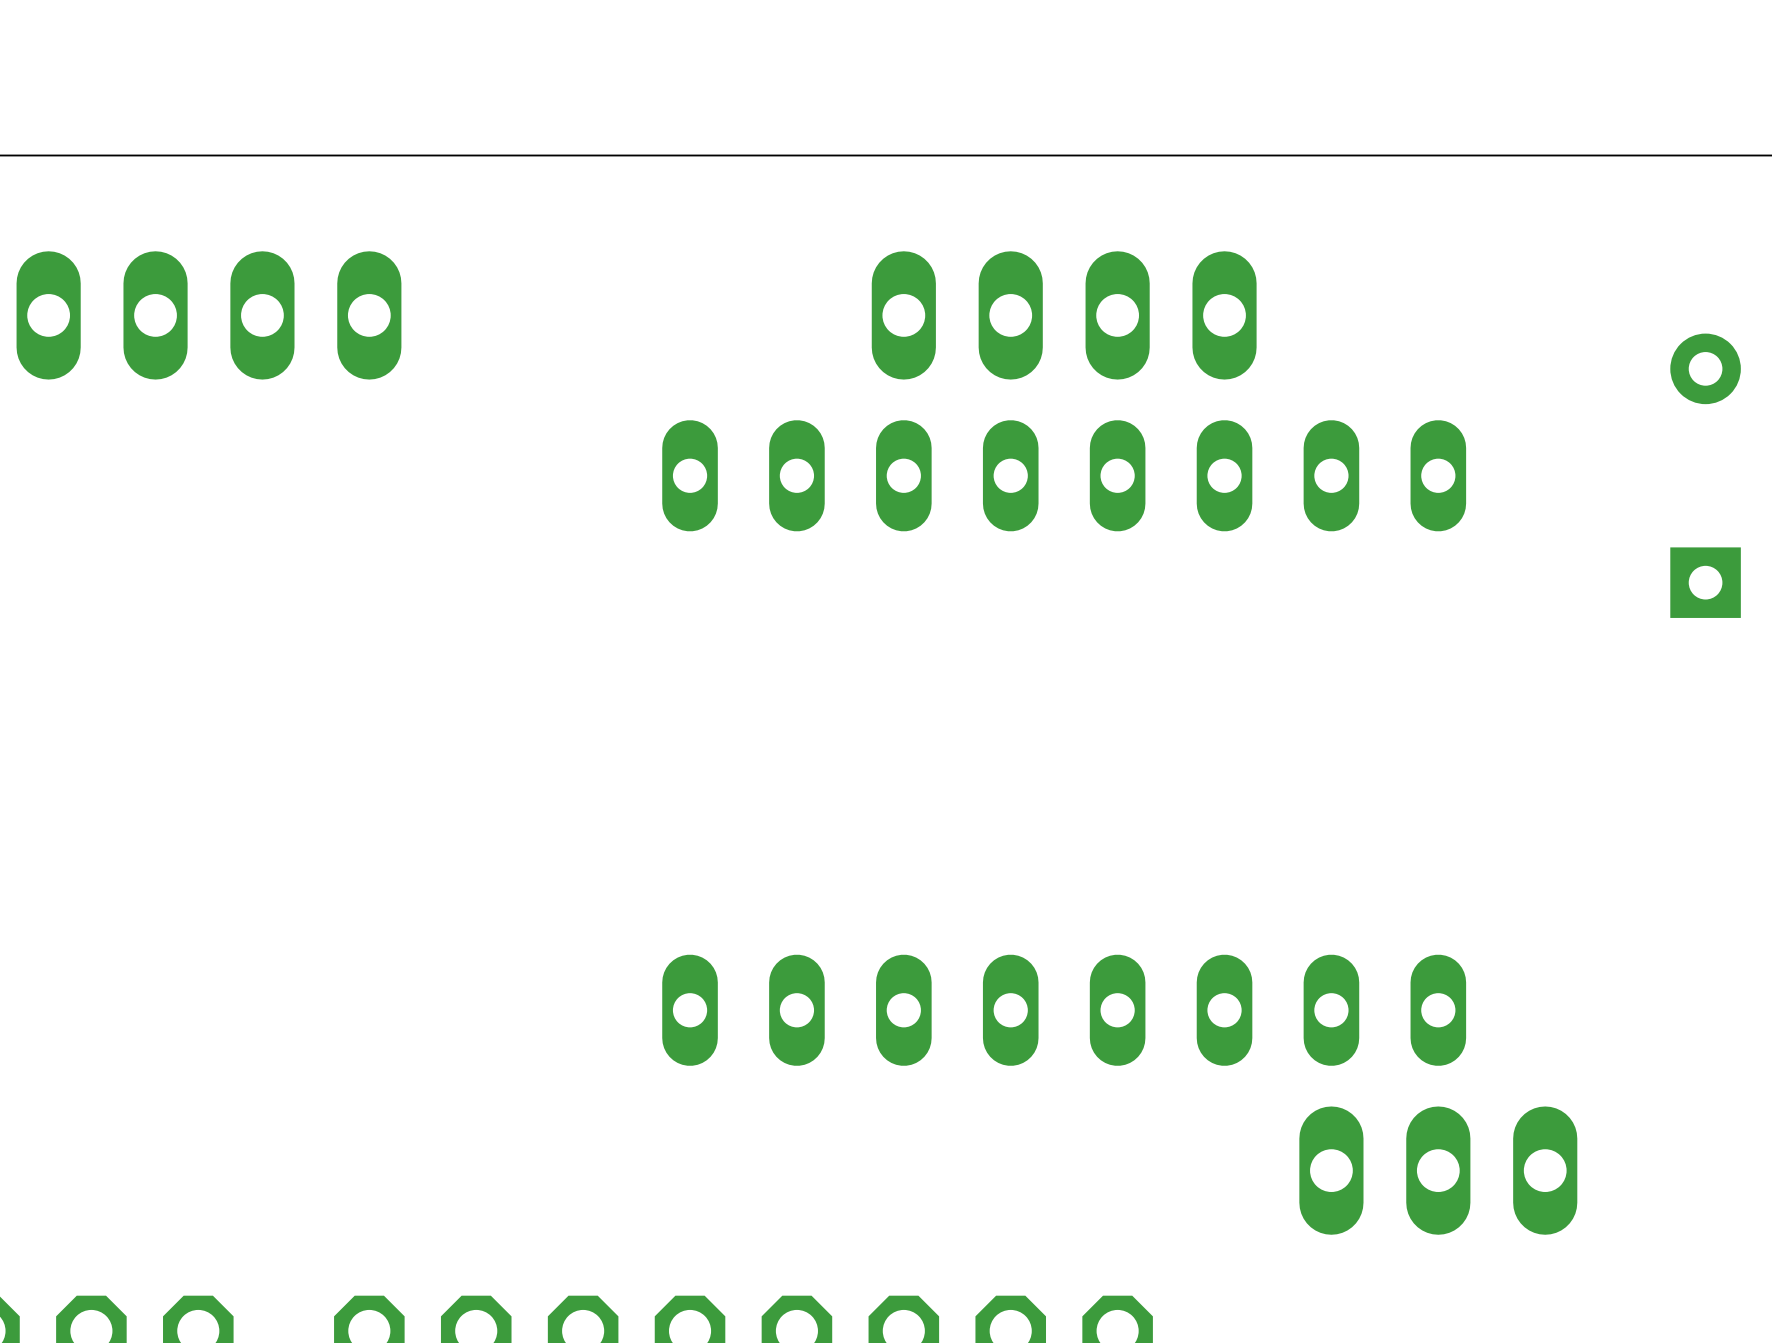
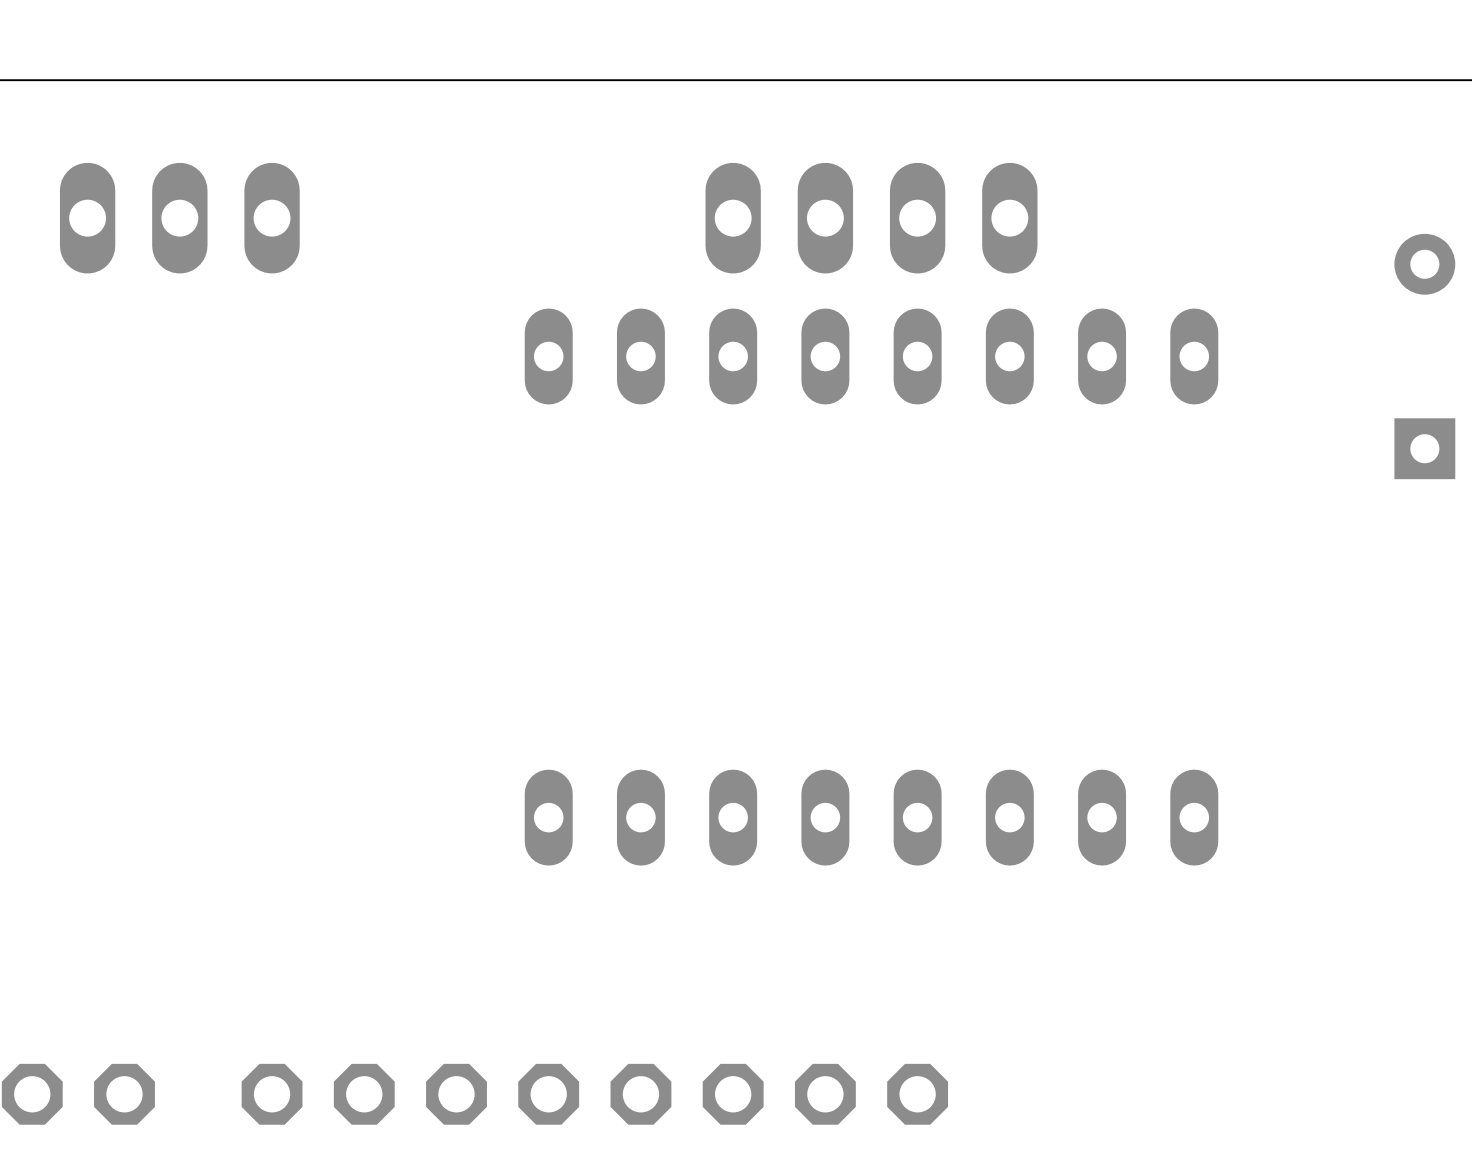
part: (1438, 1170) -> none

